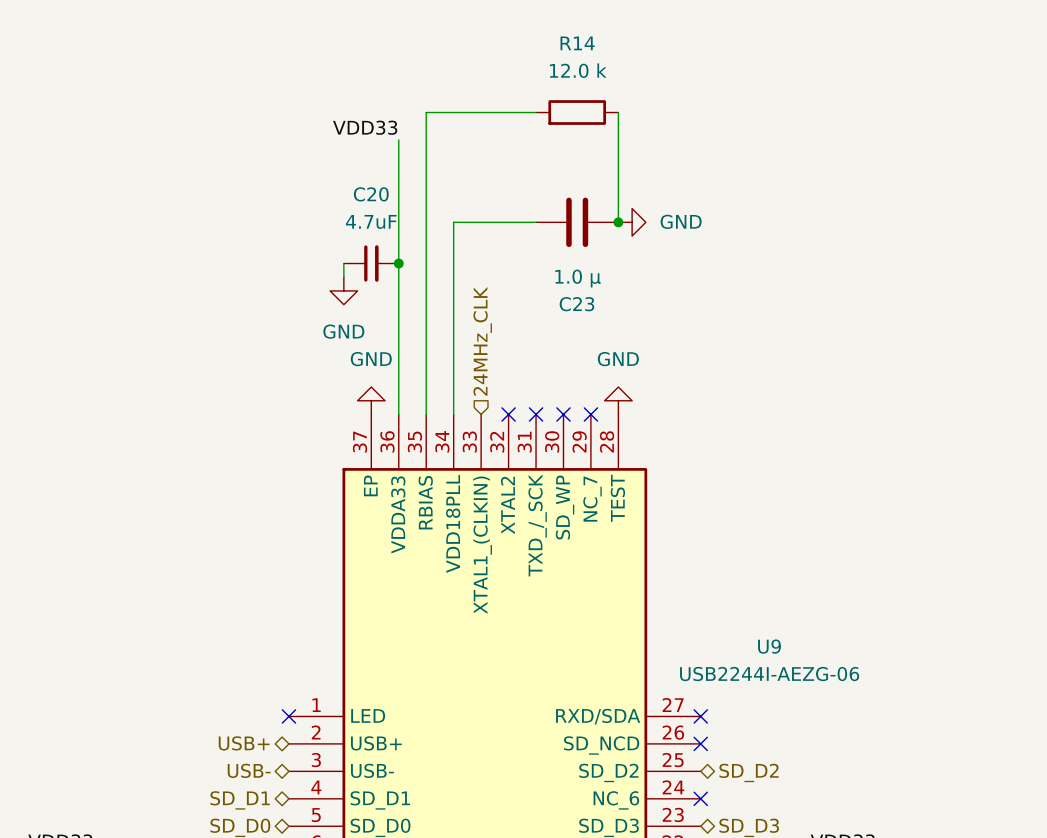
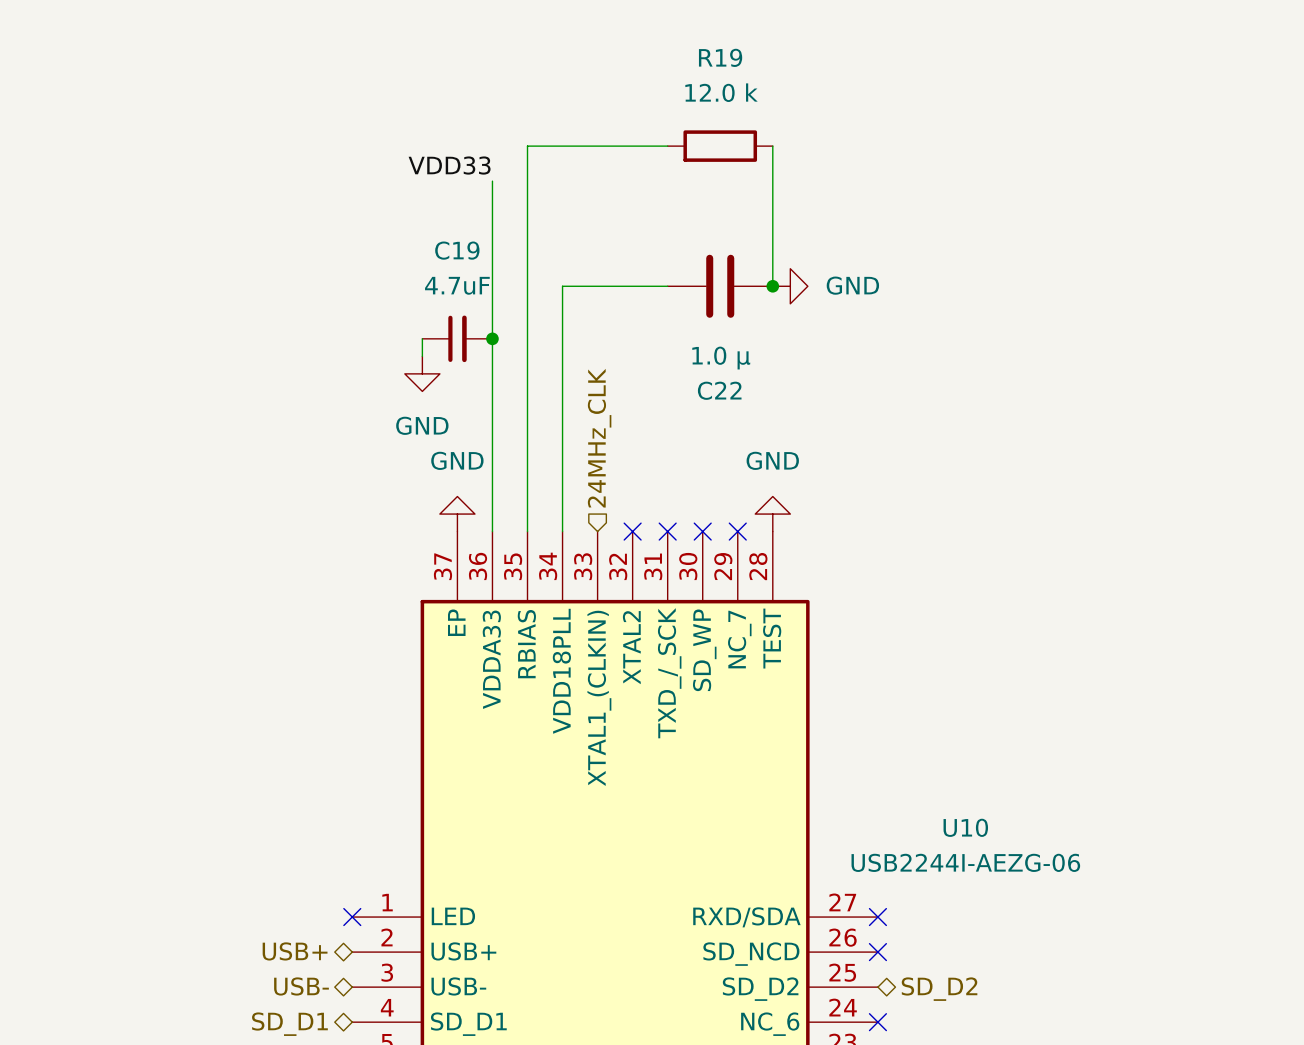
R14 name: R14 (577, 43) -> R19 (720, 57)
C20 name: C20 (371, 194) -> C19 (457, 250)
C23 name: C23 (576, 304) -> C22 (719, 390)
U9 name: U9 (769, 646) -> U10 (965, 827)

